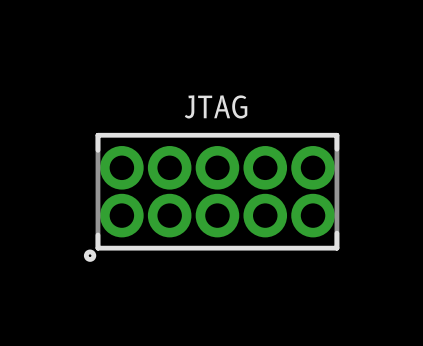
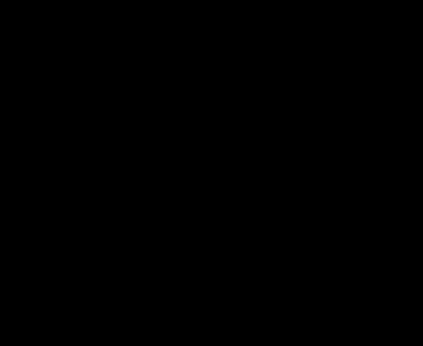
JTAG: (211, 197) -> none

